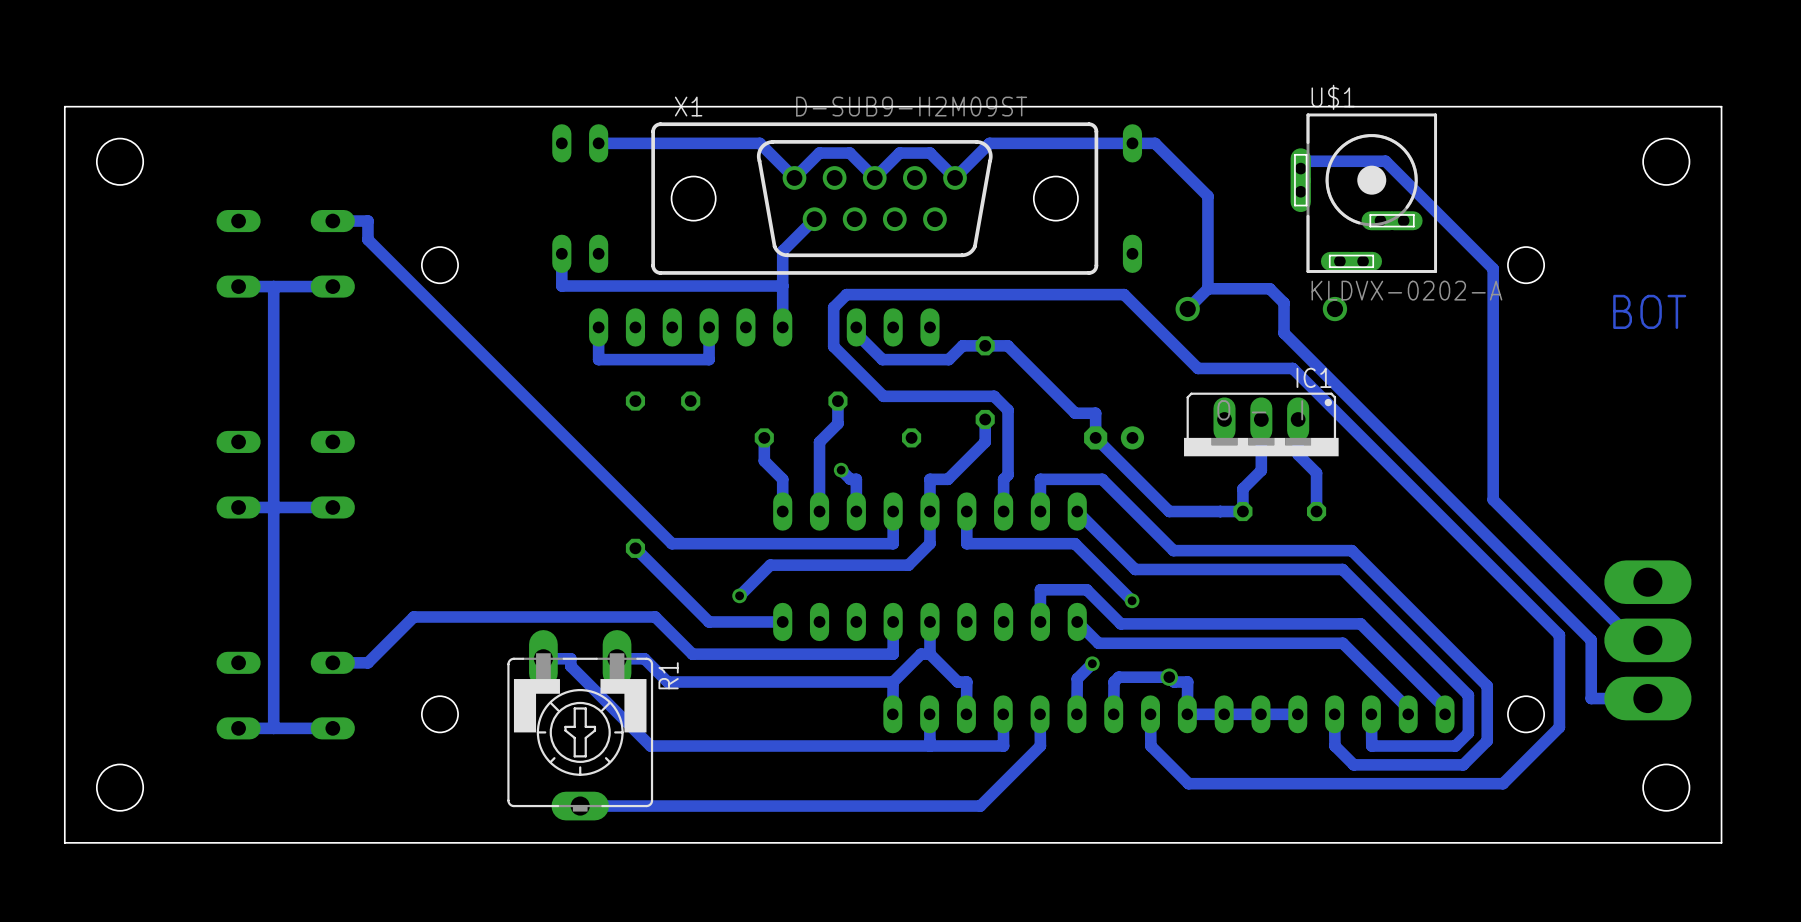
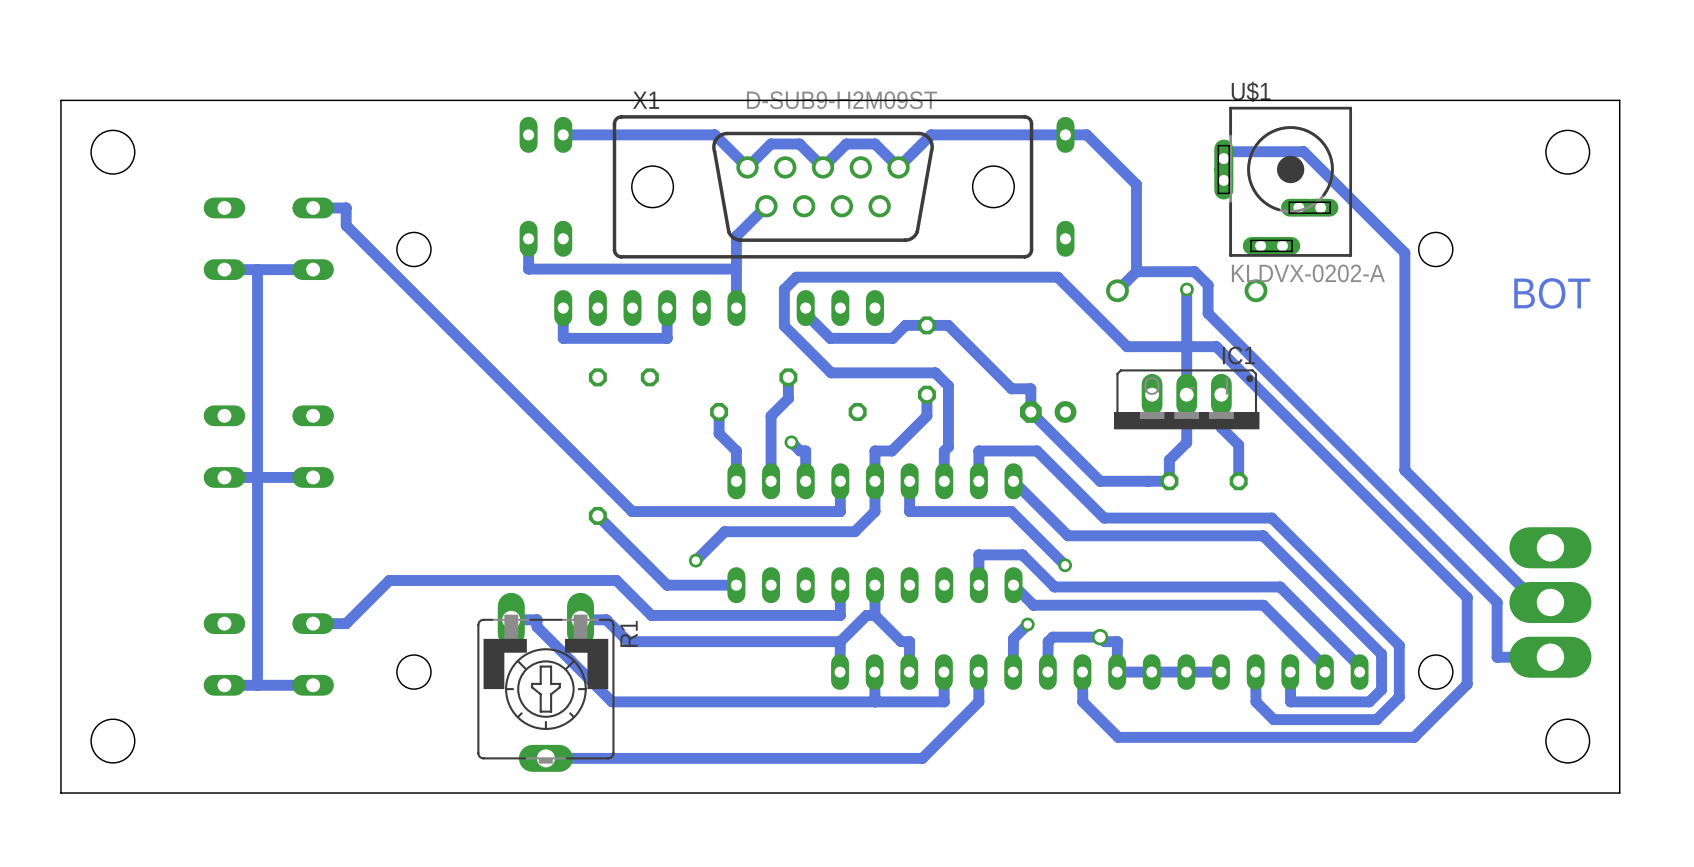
track: none -> (1186, 289) (1186, 394)
via: none -> (1186, 289)

